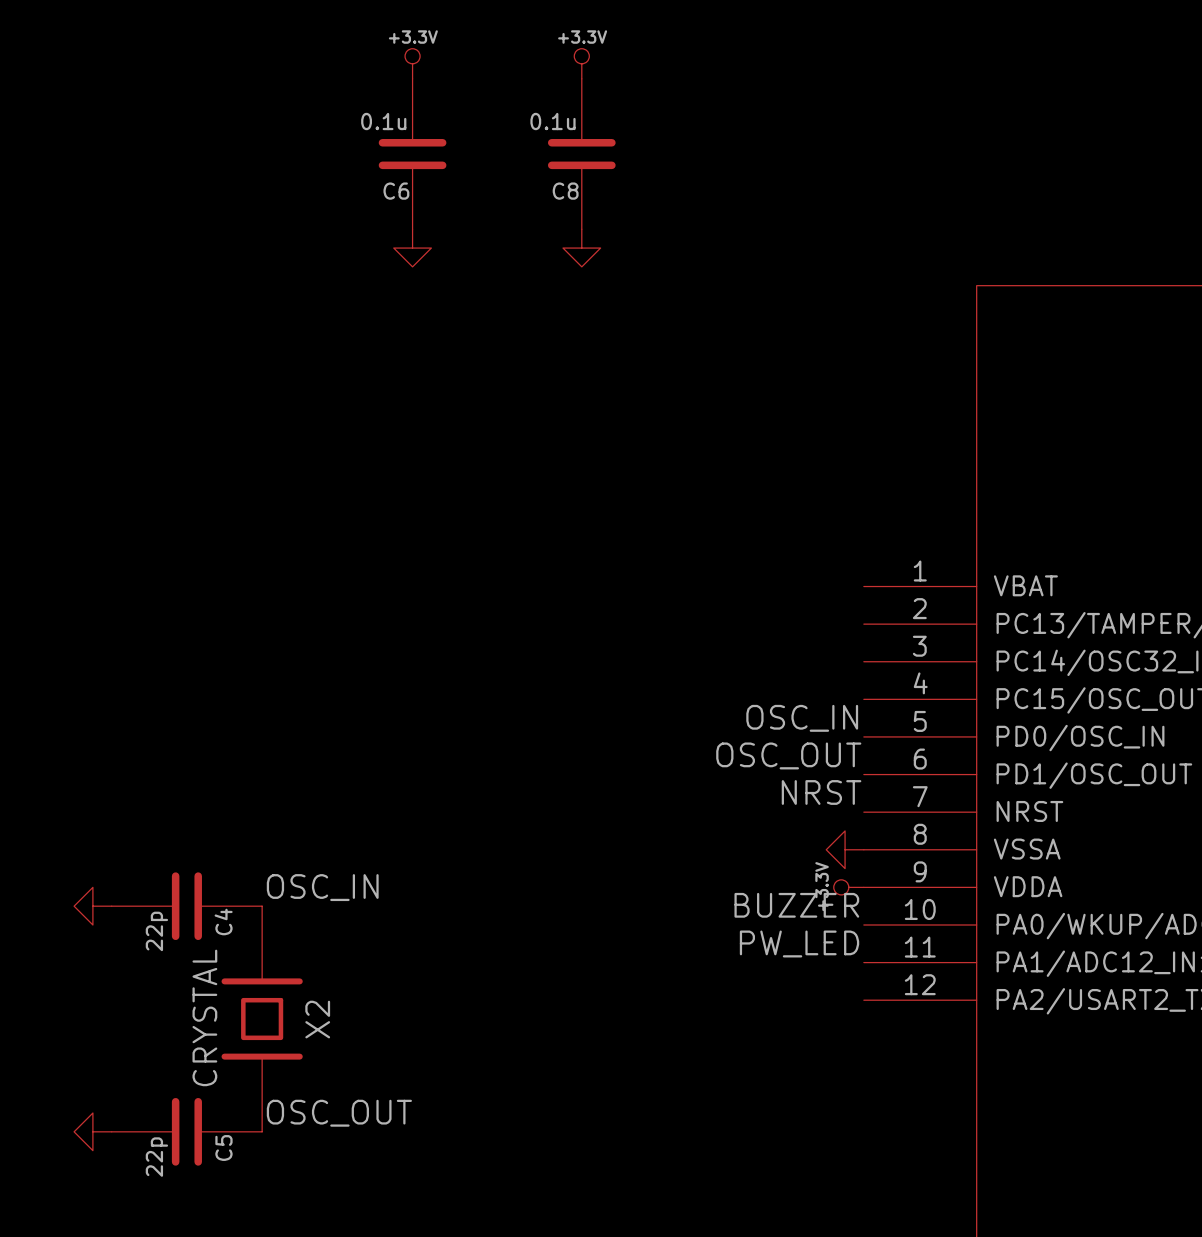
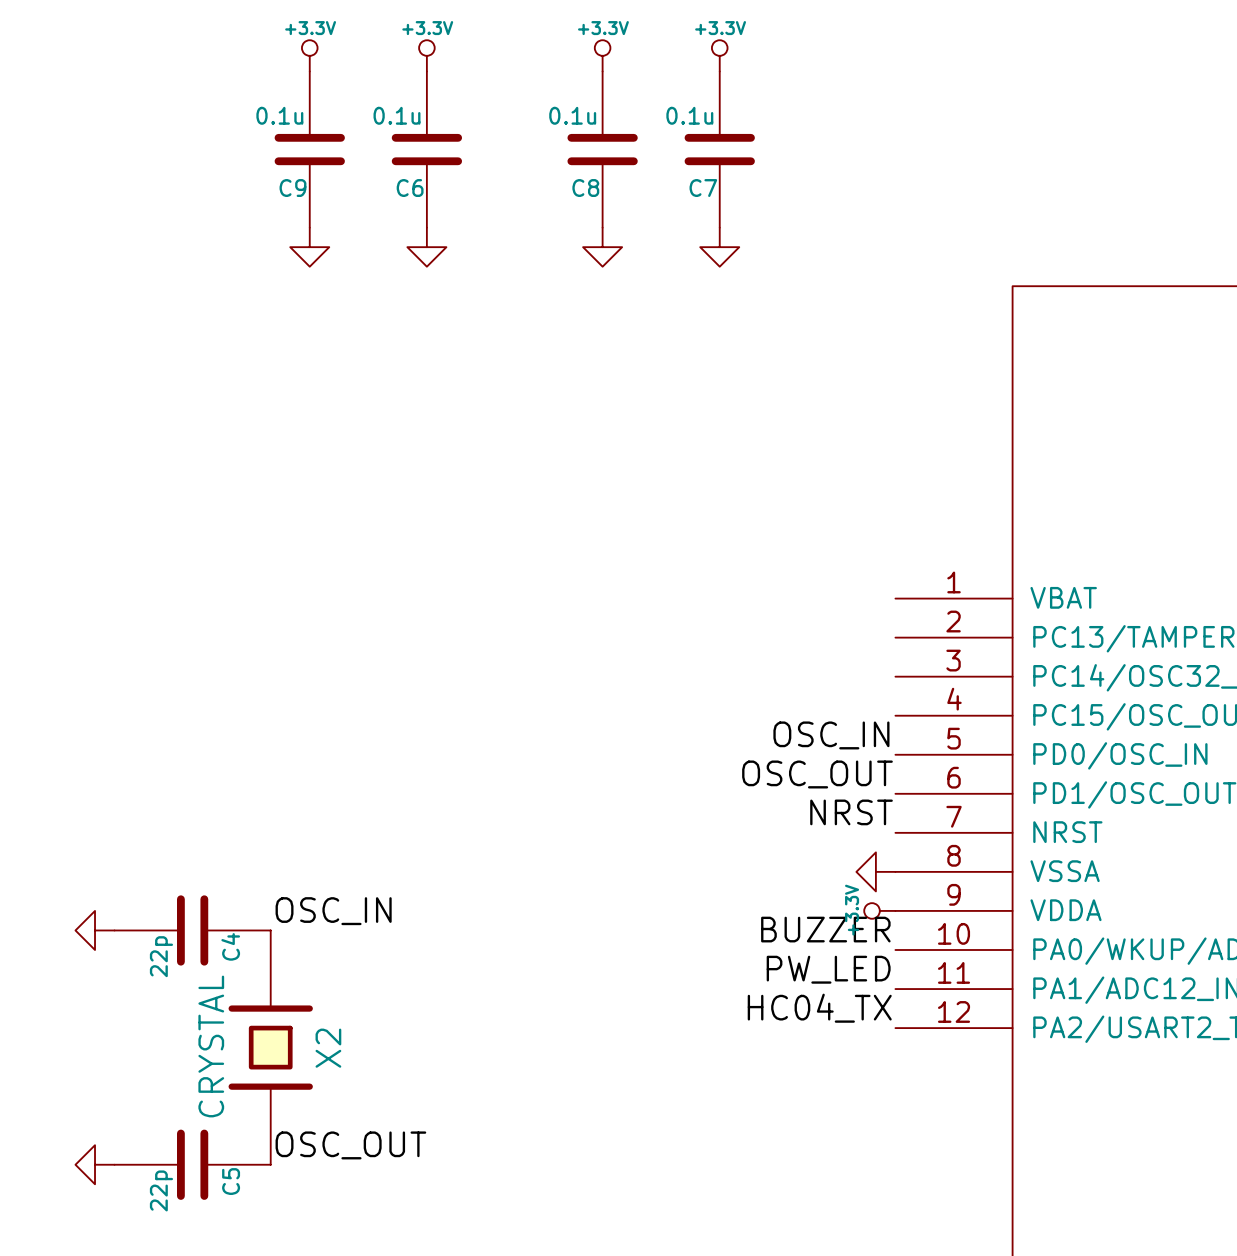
power symbol: none -> +3.3V (309, 55)
power symbol: none -> +3.3V (719, 55)
C9: none -> 0.1u (309, 149)
C7: none -> 0.1u (719, 149)
power symbol: none -> (309, 247)
power symbol: none -> (719, 247)
label: none -> HC04_TX (819, 1008)

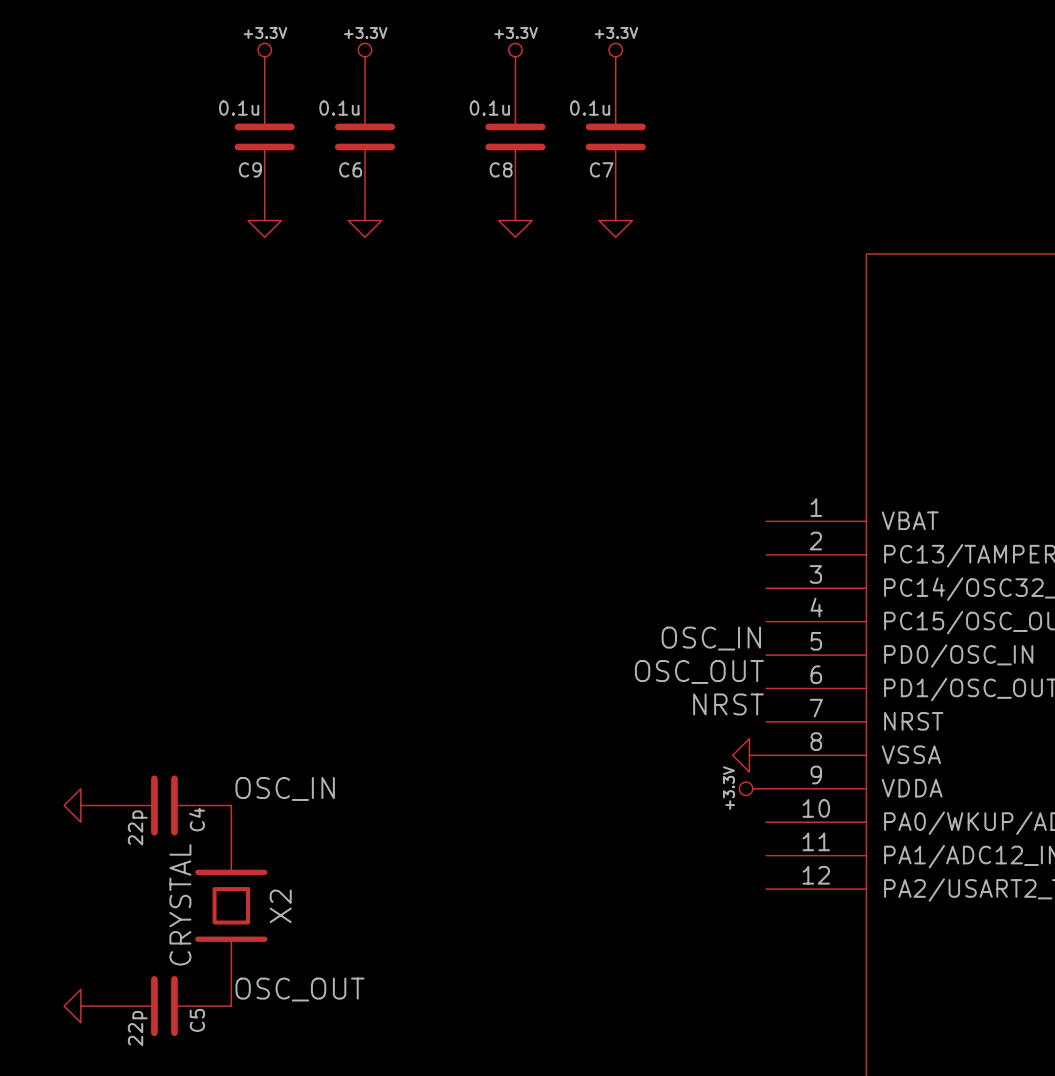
label: BUZZER (825, 929) -> none
label: PW_LED (828, 969) -> none
label: HC04_TX (819, 1008) -> none

